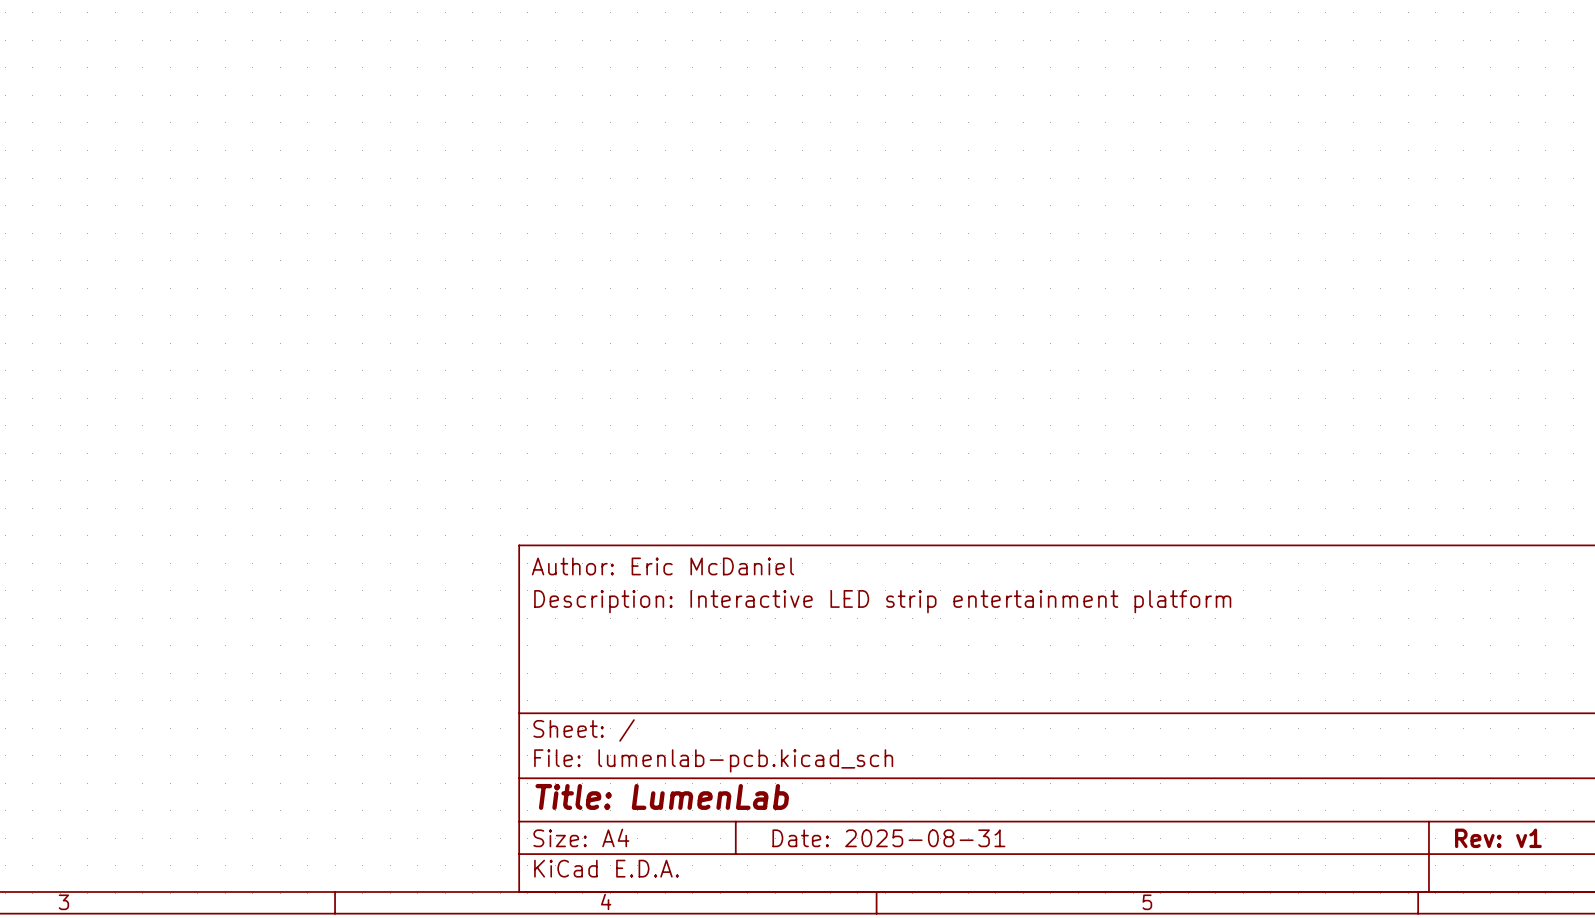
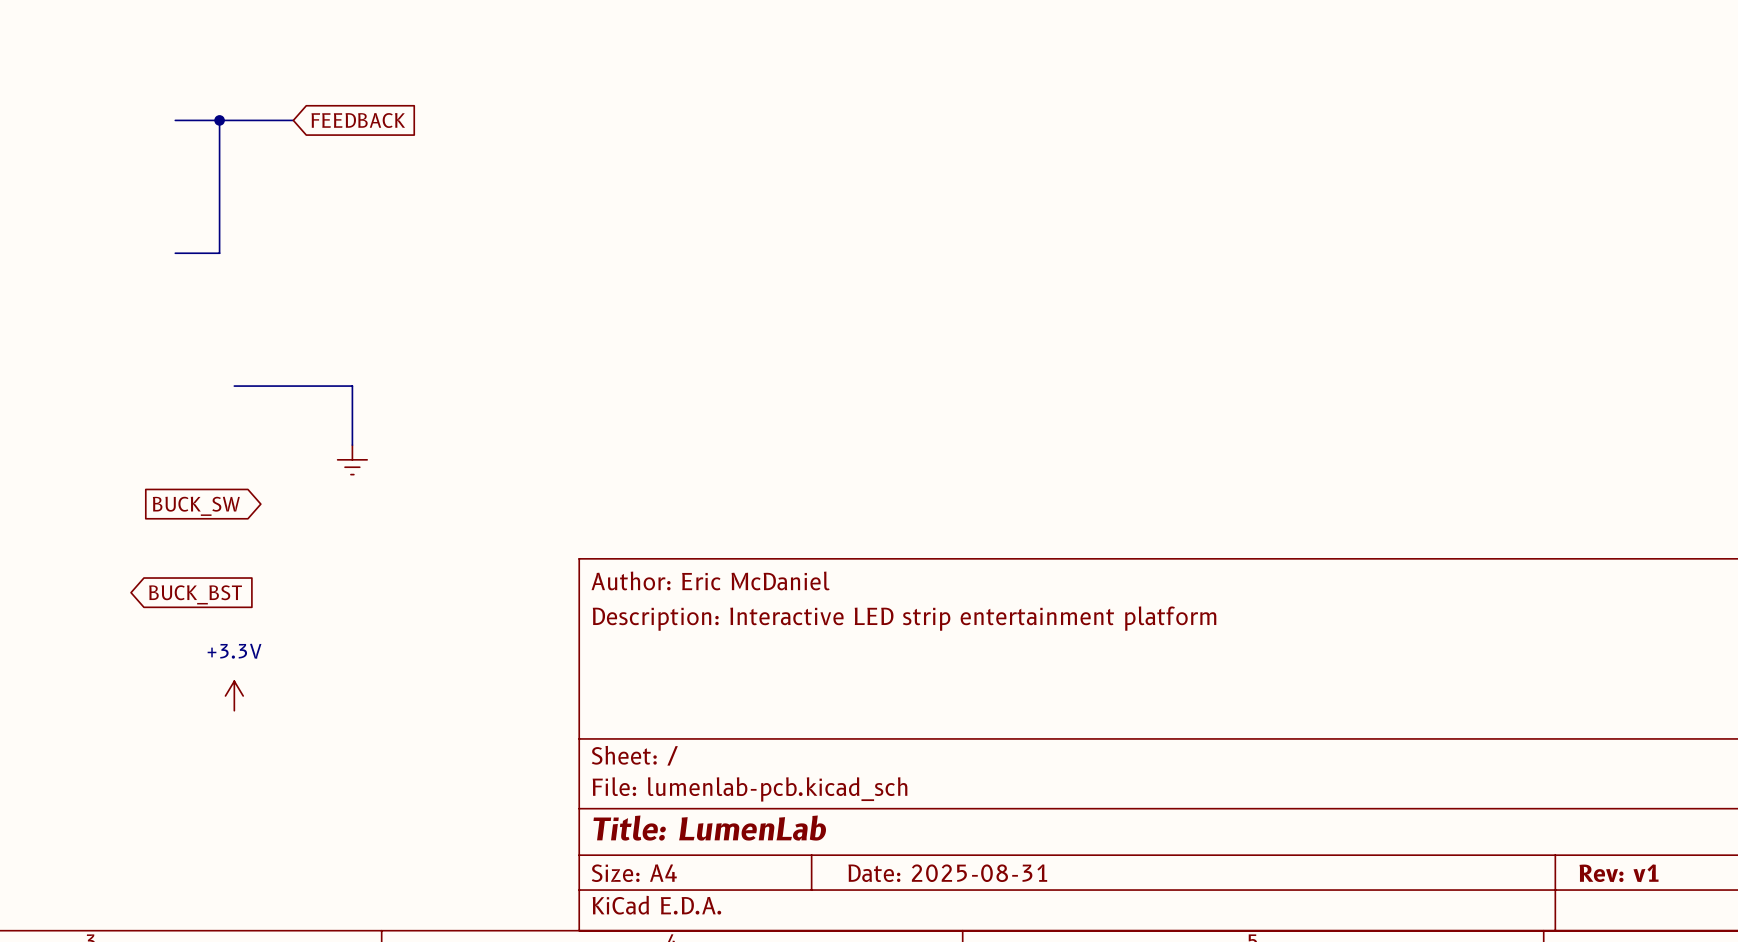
wire: none -> (175, 120) (293, 120)
wire: none -> (219, 120) (219, 253) (175, 253)
junction: none -> (219, 120)
global label: none -> FEEDBACK (358, 120)
wire: none -> (234, 386) (352, 386) (352, 445)
power symbol: none -> (352, 459)
global label: none -> BUCK_SW (196, 506)
global label: none -> BUCK_BST (195, 594)
power symbol: none -> +3.3V (234, 695)

